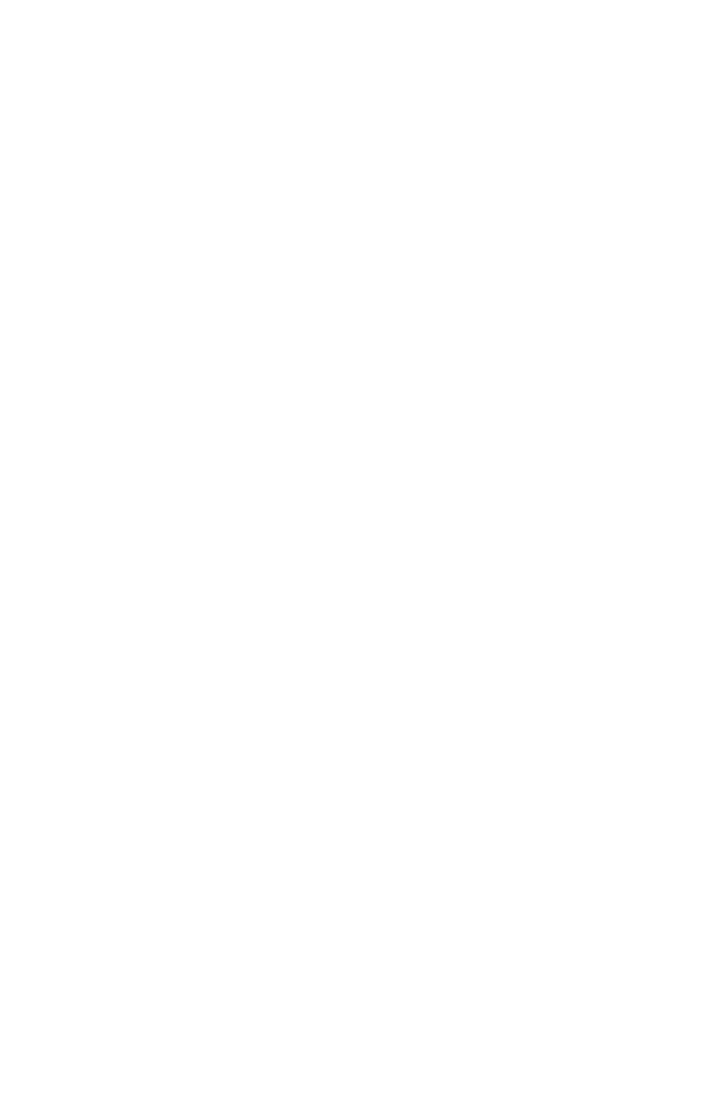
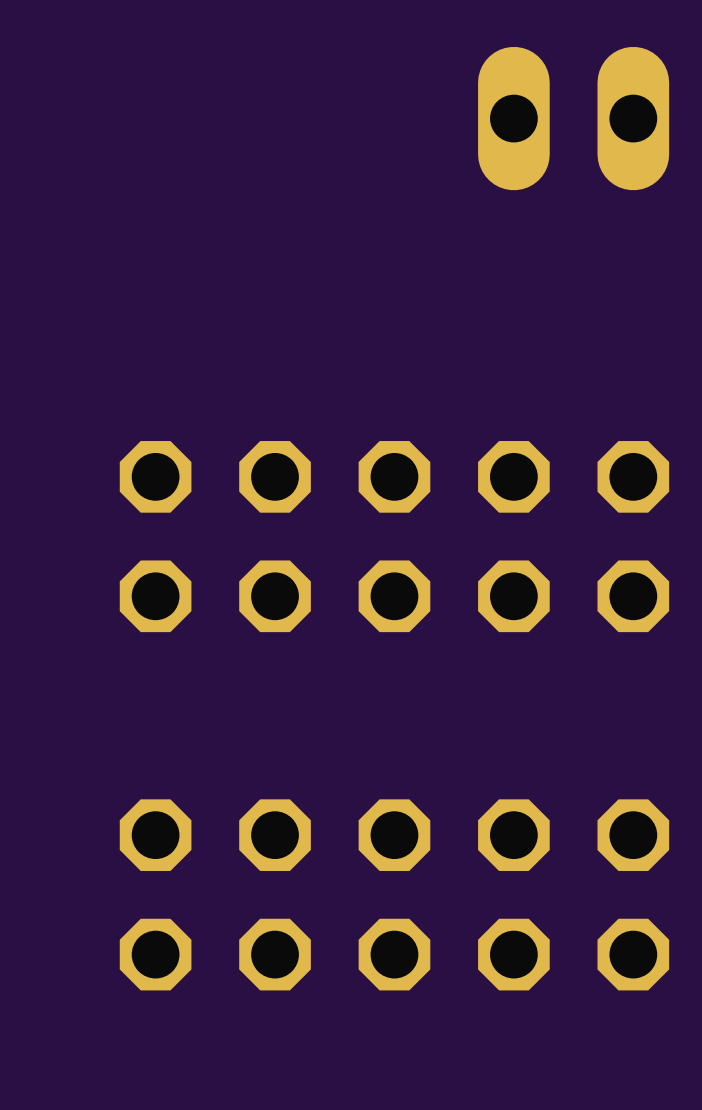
part: none -> (573, 118)
part: none -> (394, 536)
part: none -> (394, 894)

